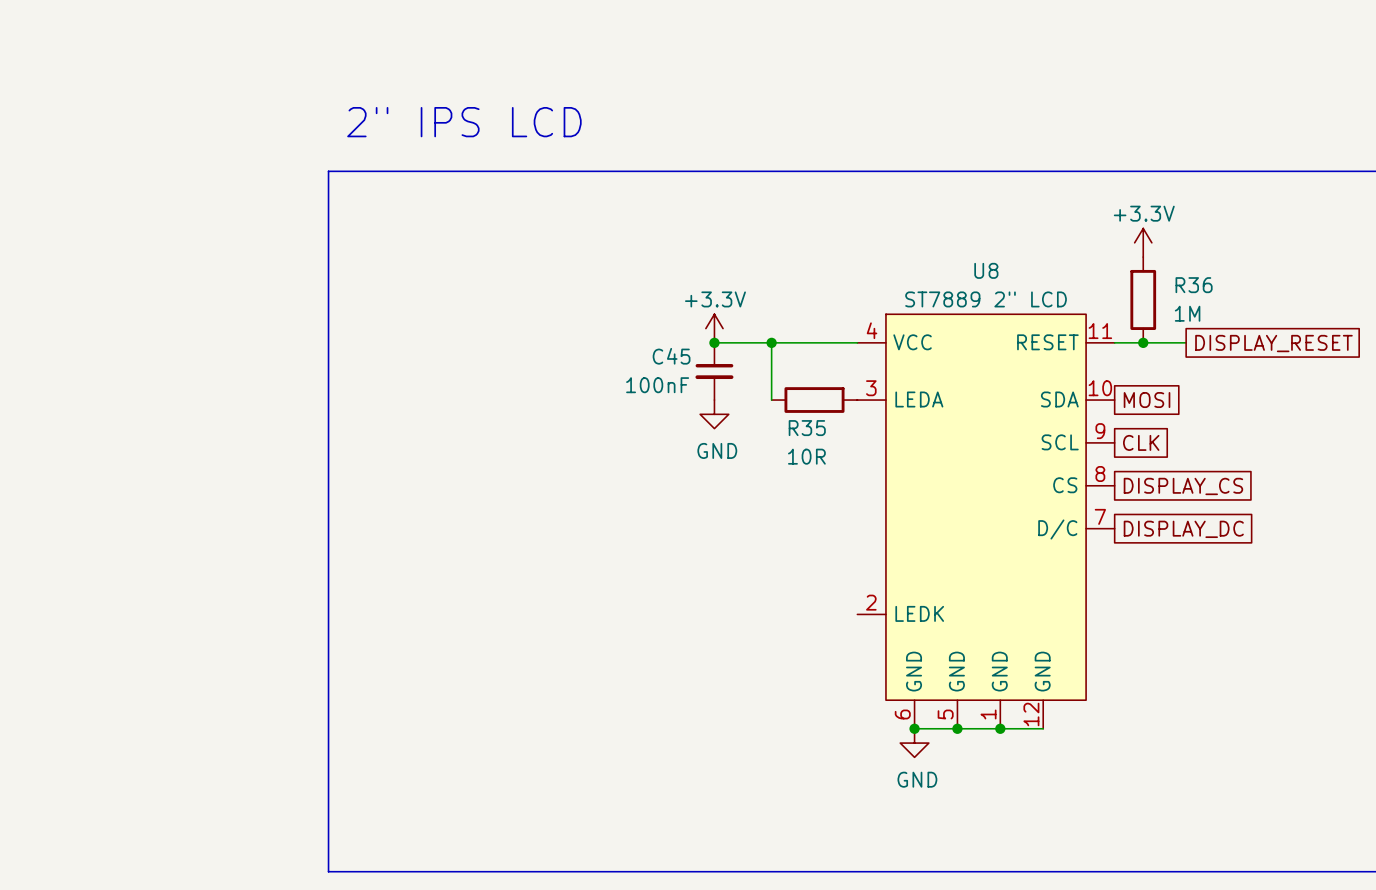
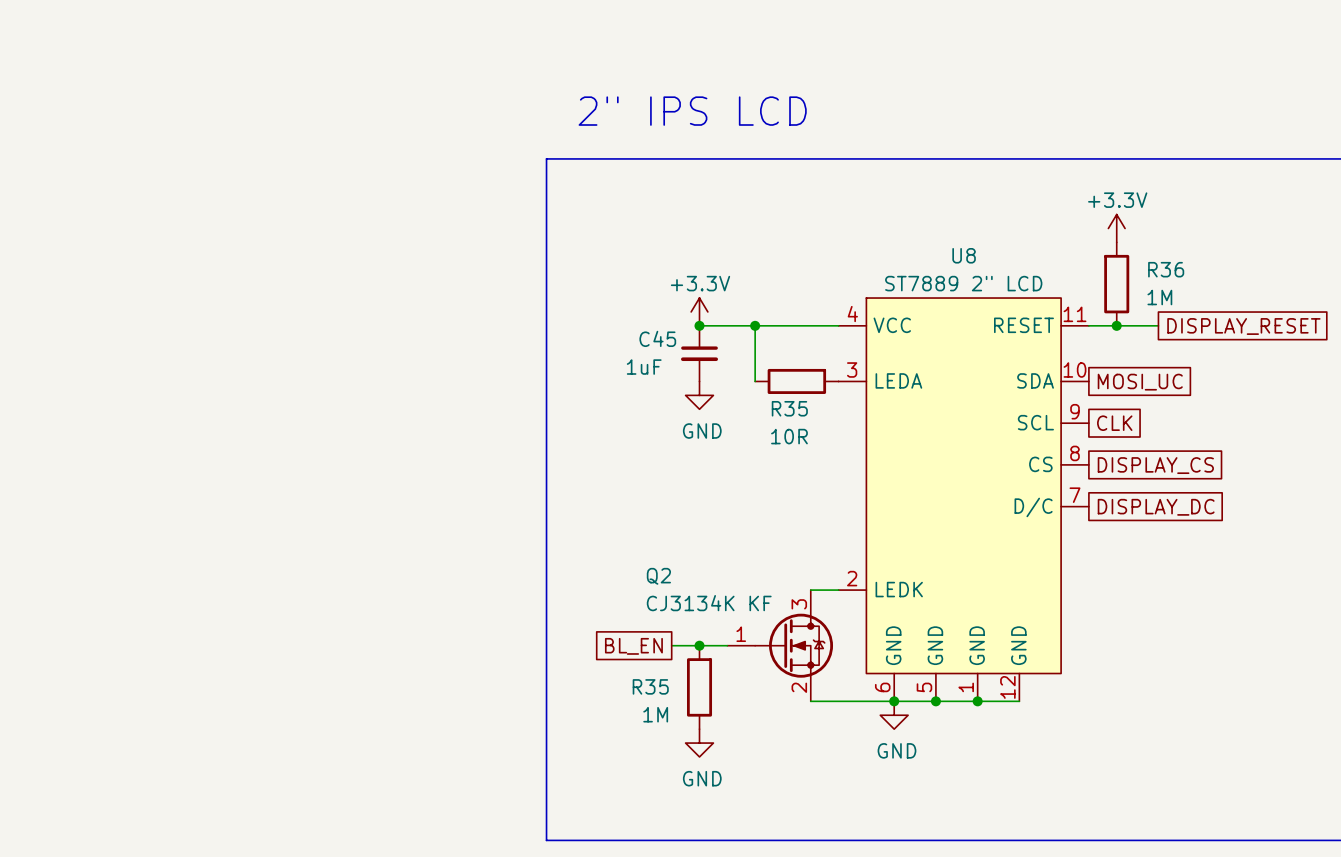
text position: 2" IPS LCD (464, 122) -> 2" IPS LCD (692, 111)
line: (557, 171) (328, 171) (328, 871) (557, 871) -> (546, 158) (546, 840)
C45 value: 100nF (657, 385) -> 1uF (644, 367)
global label: MOSI (1147, 400) -> MOSI_UC (1140, 382)
wire: none -> (810, 590) (838, 590)
wire: none -> (671, 645) (727, 645)
junction: none -> (699, 645)
Q2: none -> CJ3134K KF (780, 645)
global label: none -> BL_EN (633, 646)
R35: none -> 1M (699, 687)
wire: none -> (810, 701) (894, 701)
power symbol: none -> GND (699, 743)

